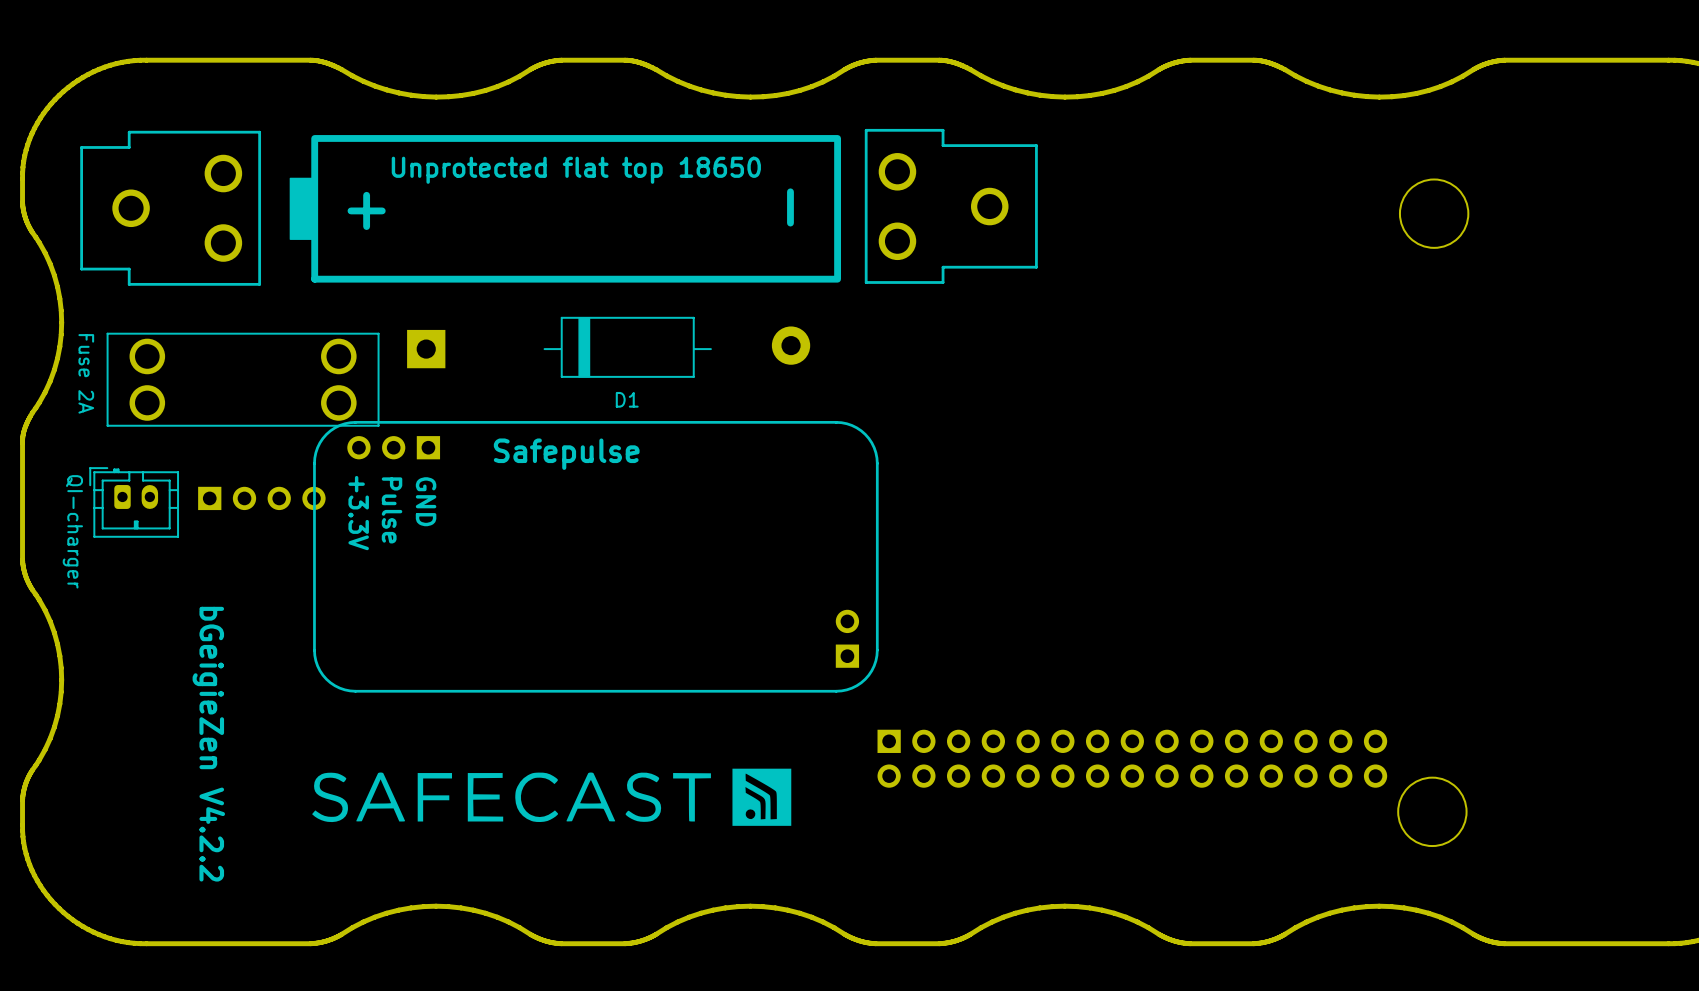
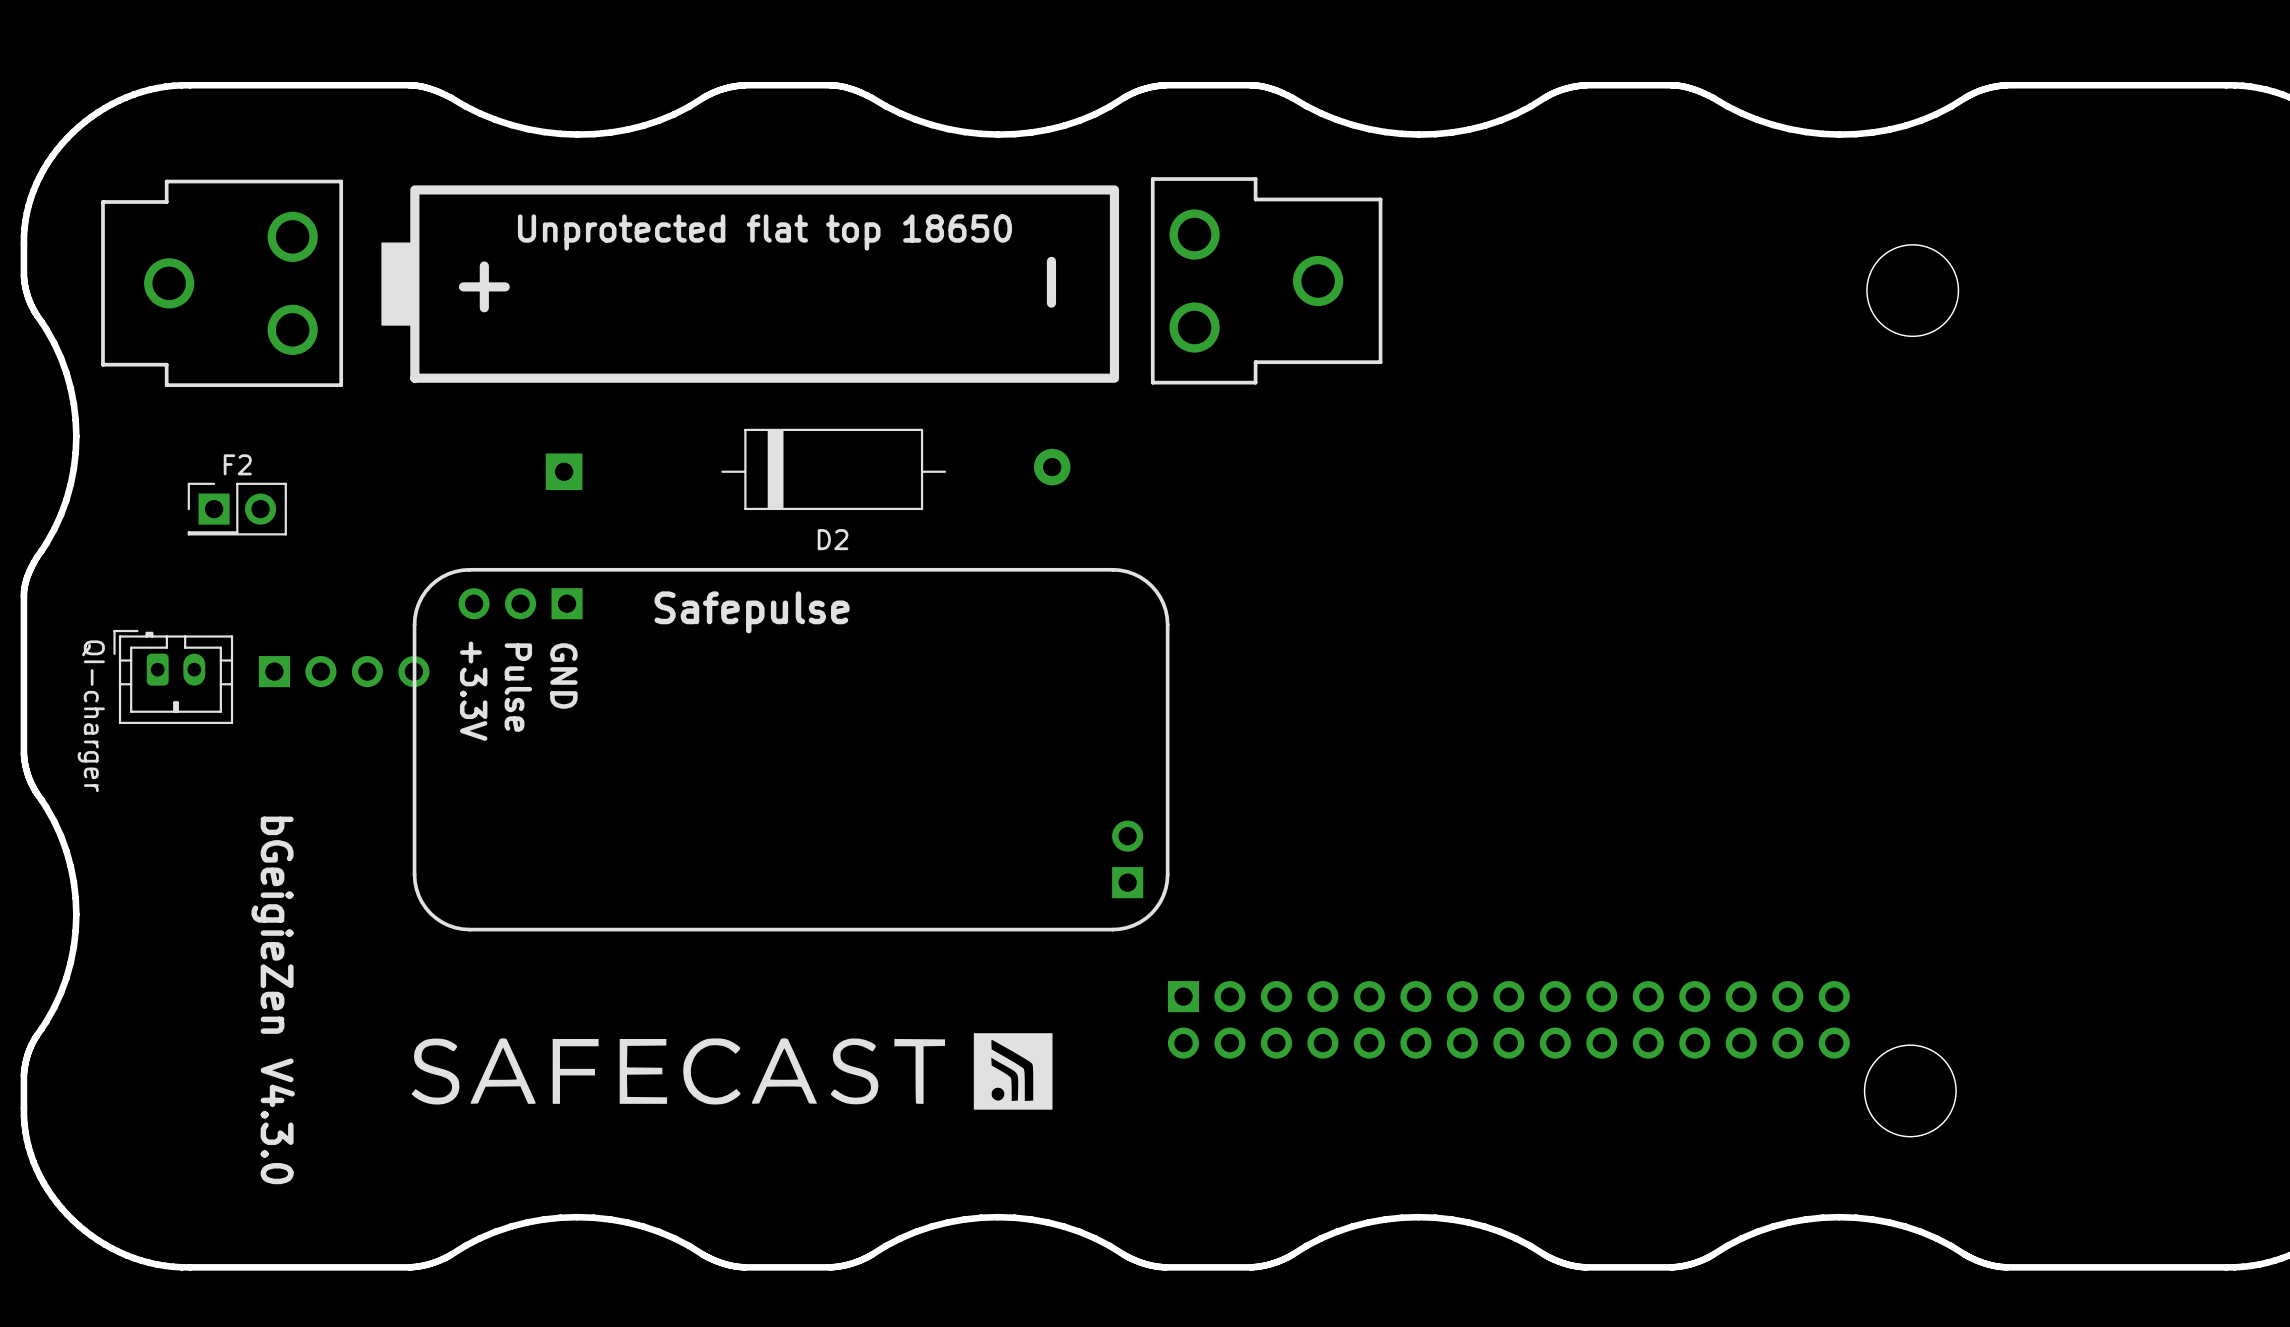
D1: (608, 347) -> none
D2: none -> (808, 469)
F2: none -> (237, 509)
Fuse 2A: (243, 379) -> none
text: bGeigieZen V4.2.2 (208, 744) -> bGeigieZen V4.3.0 (273, 1000)

